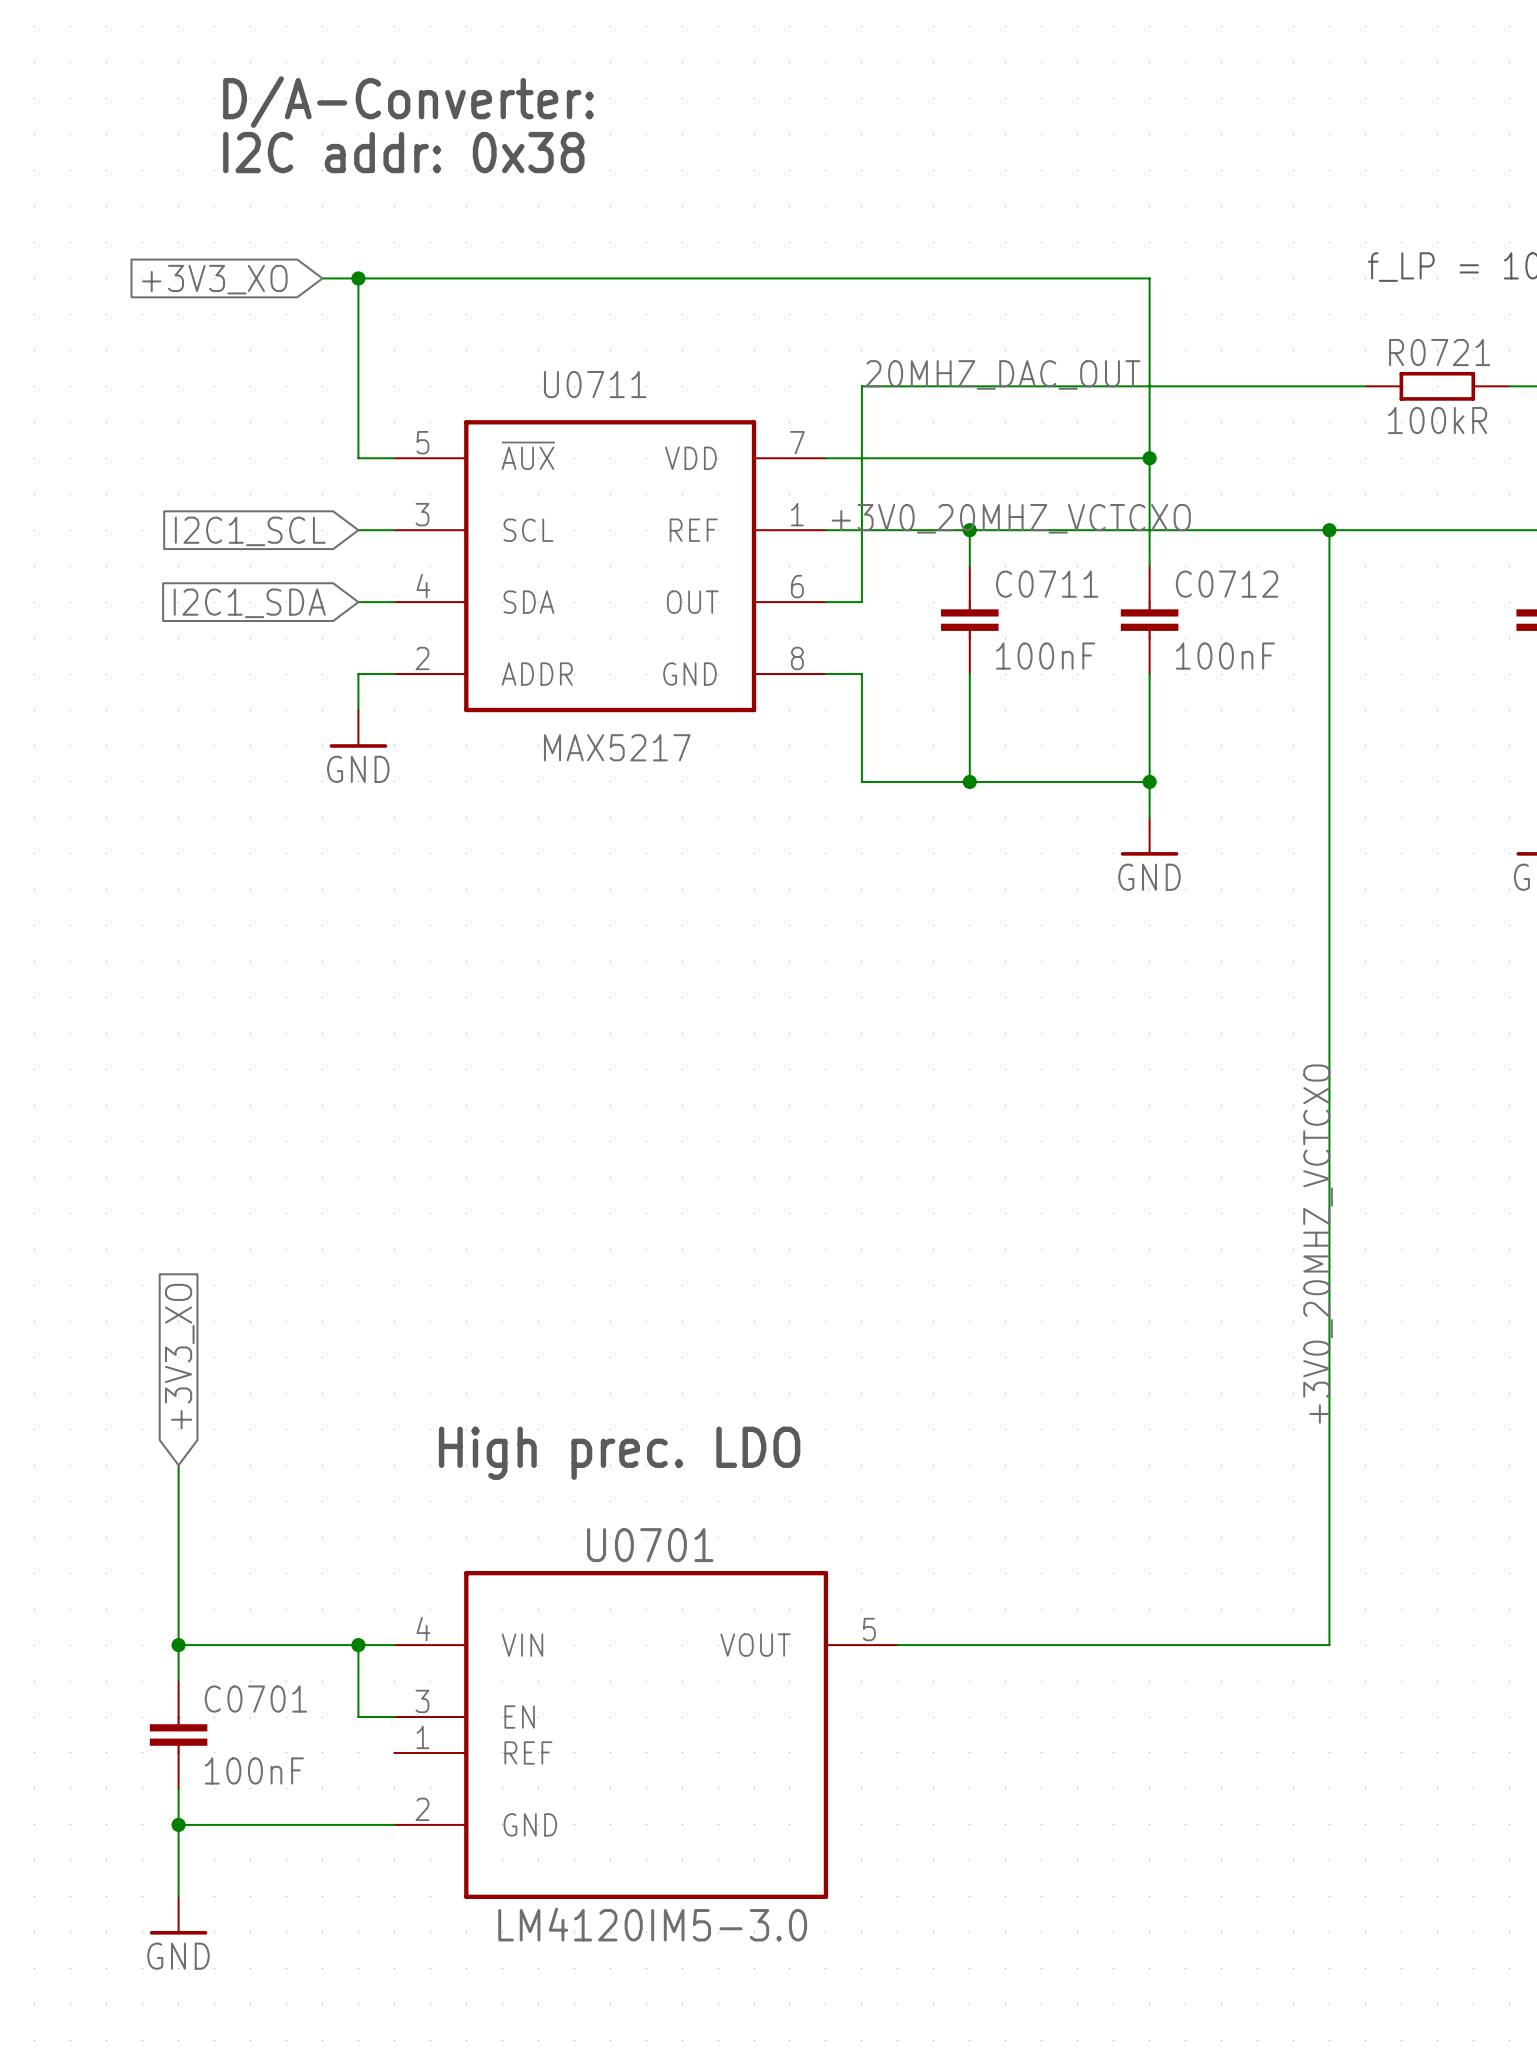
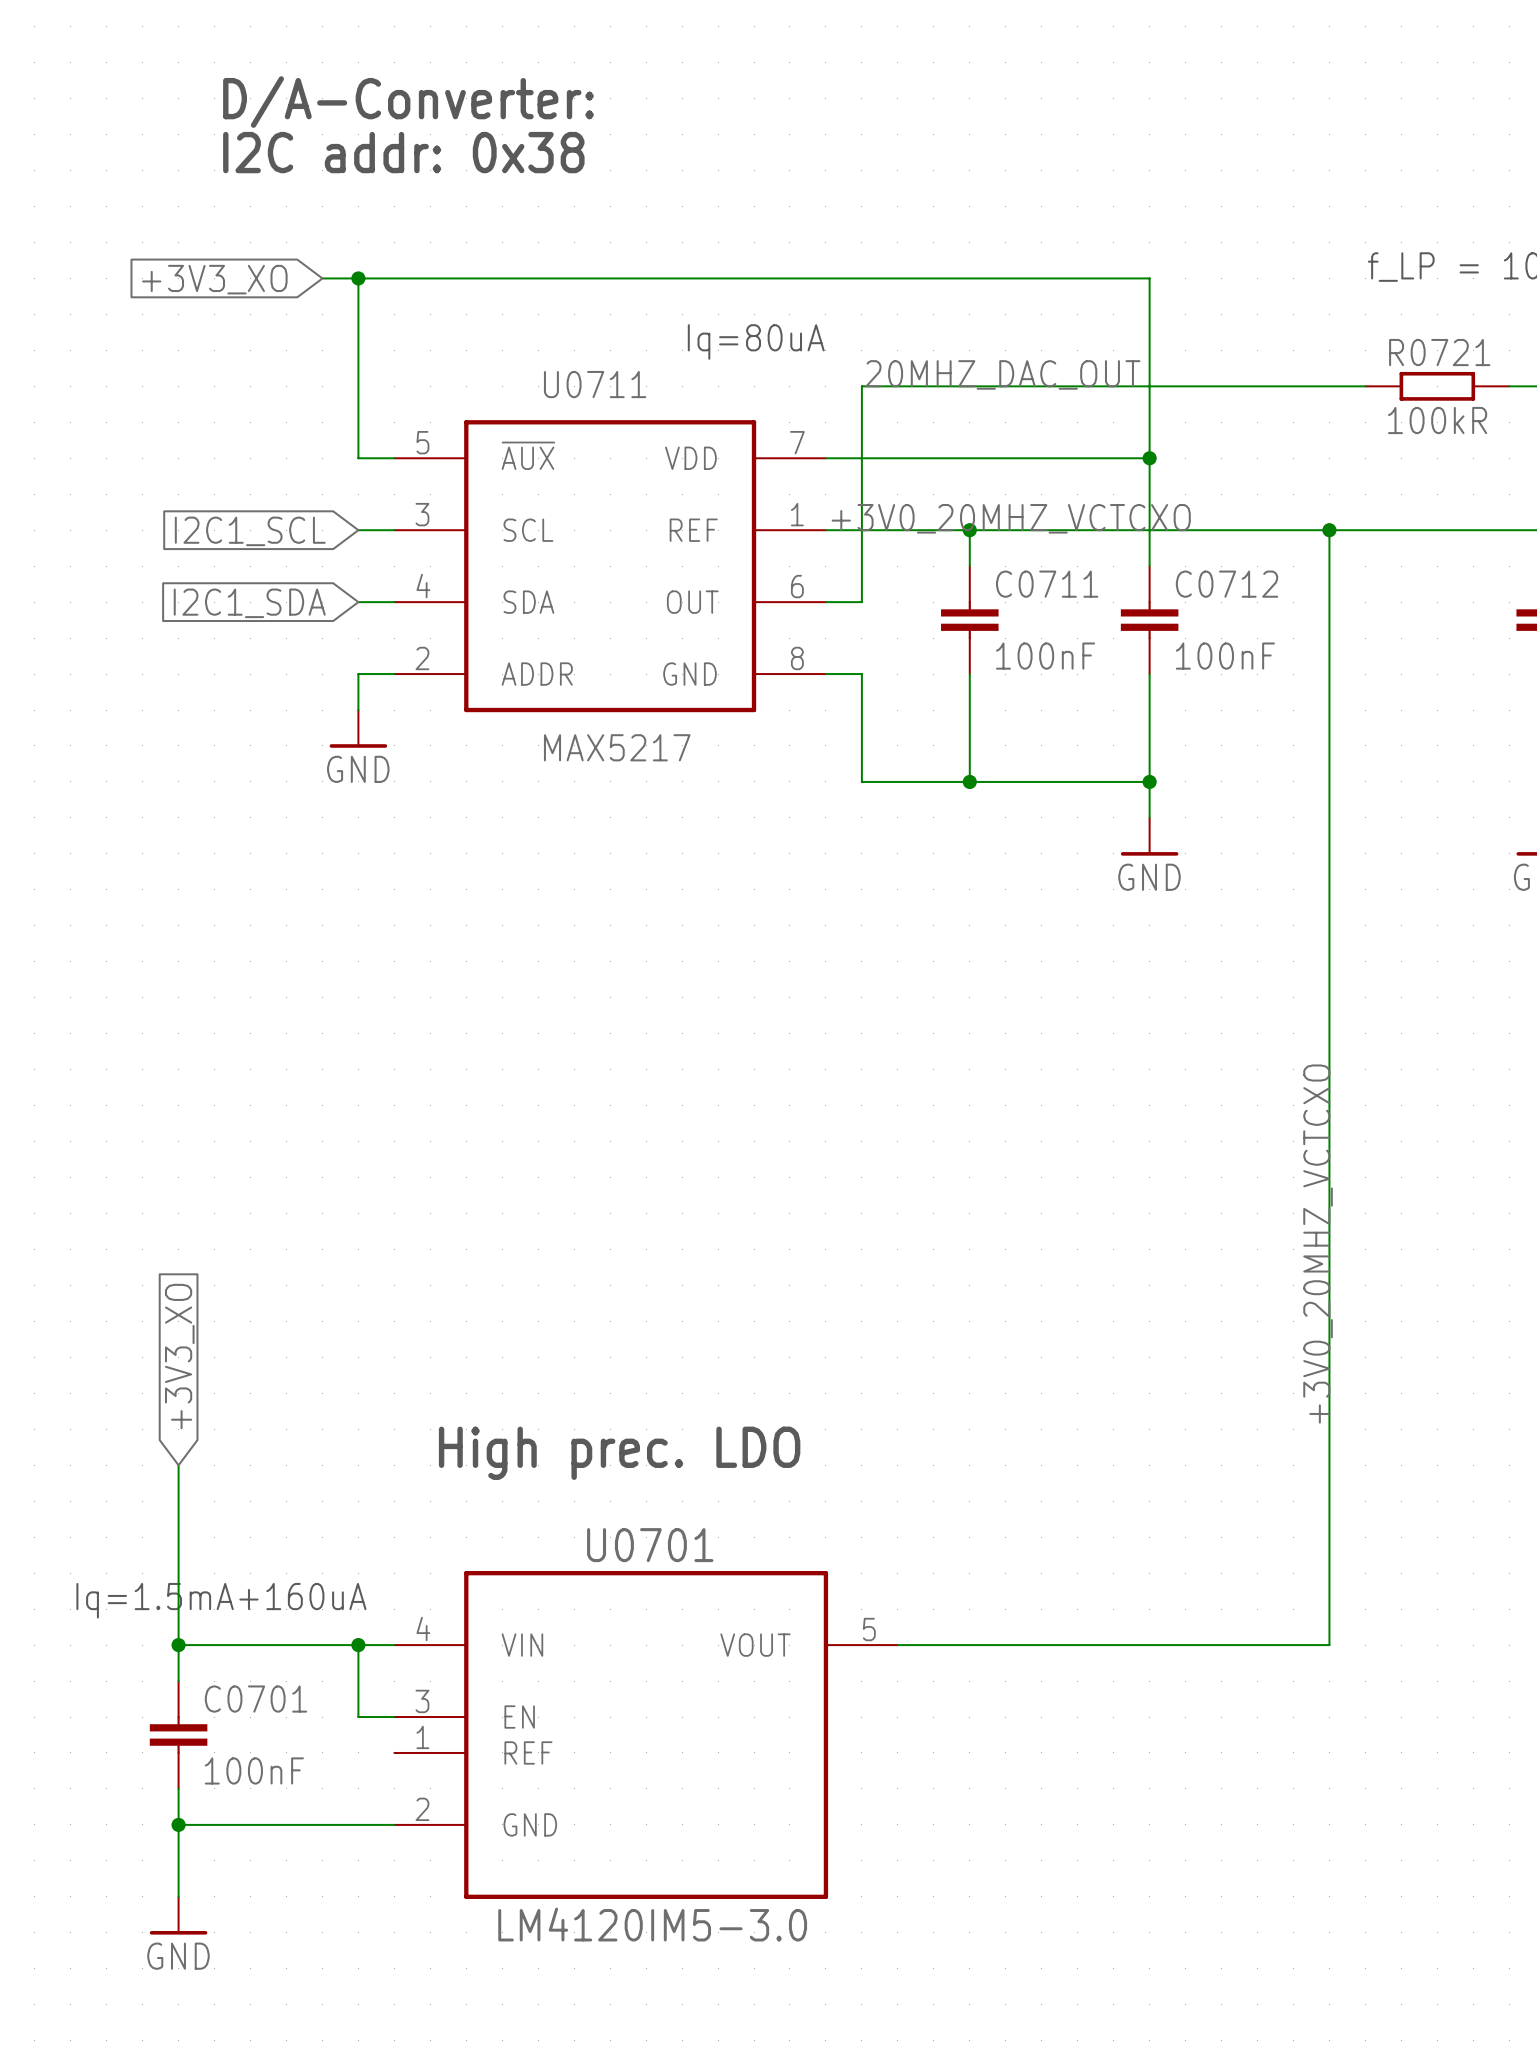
text: none -> Iq=80uA (756, 341)
text: none -> Iq=1.5mA+160uA (221, 1600)

